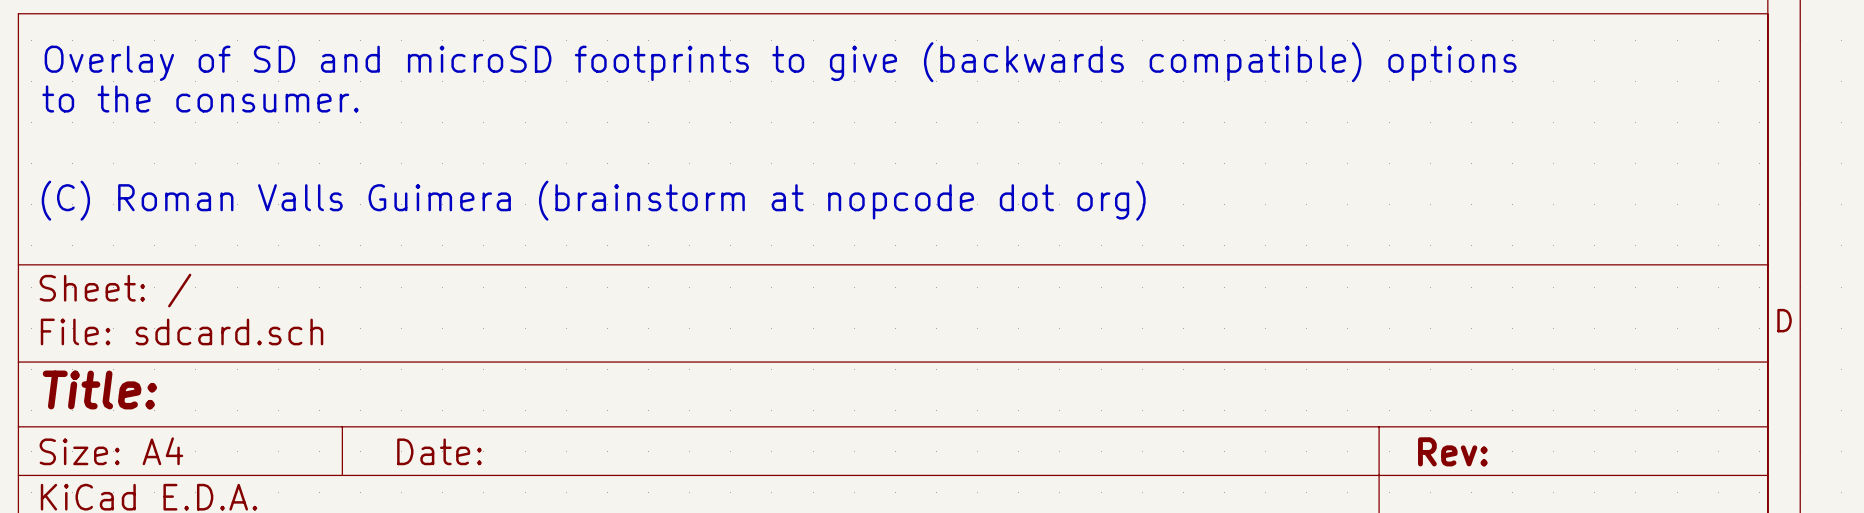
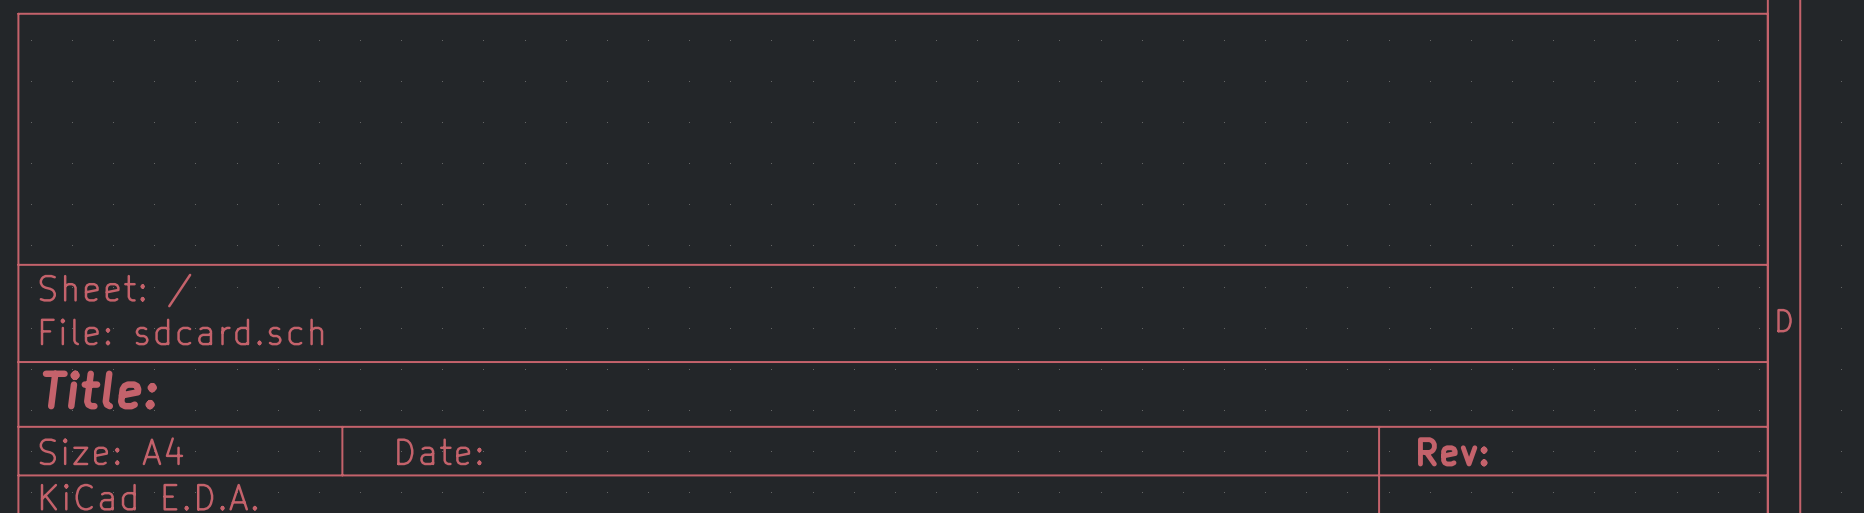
text: Overlay of SD and microSD footprints to give (backwards compatible) options (780, 62) -> none
text: to the consumer. (200, 98) -> none
text: (C) Roman Valls Guimera (brainstorm at nopcode dot org) (593, 200) -> none

